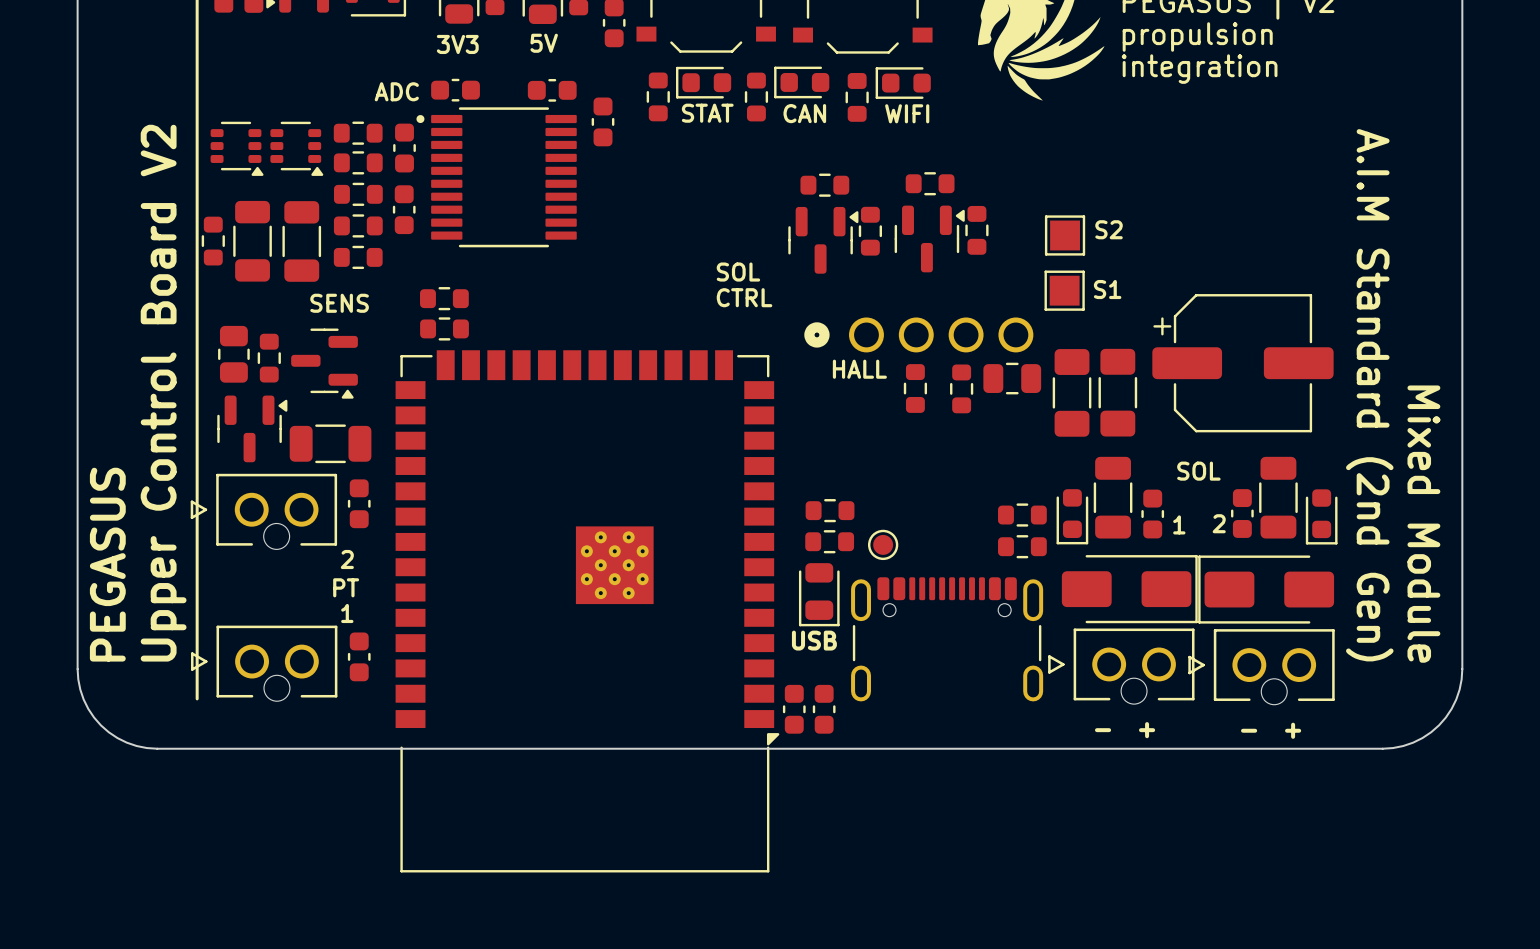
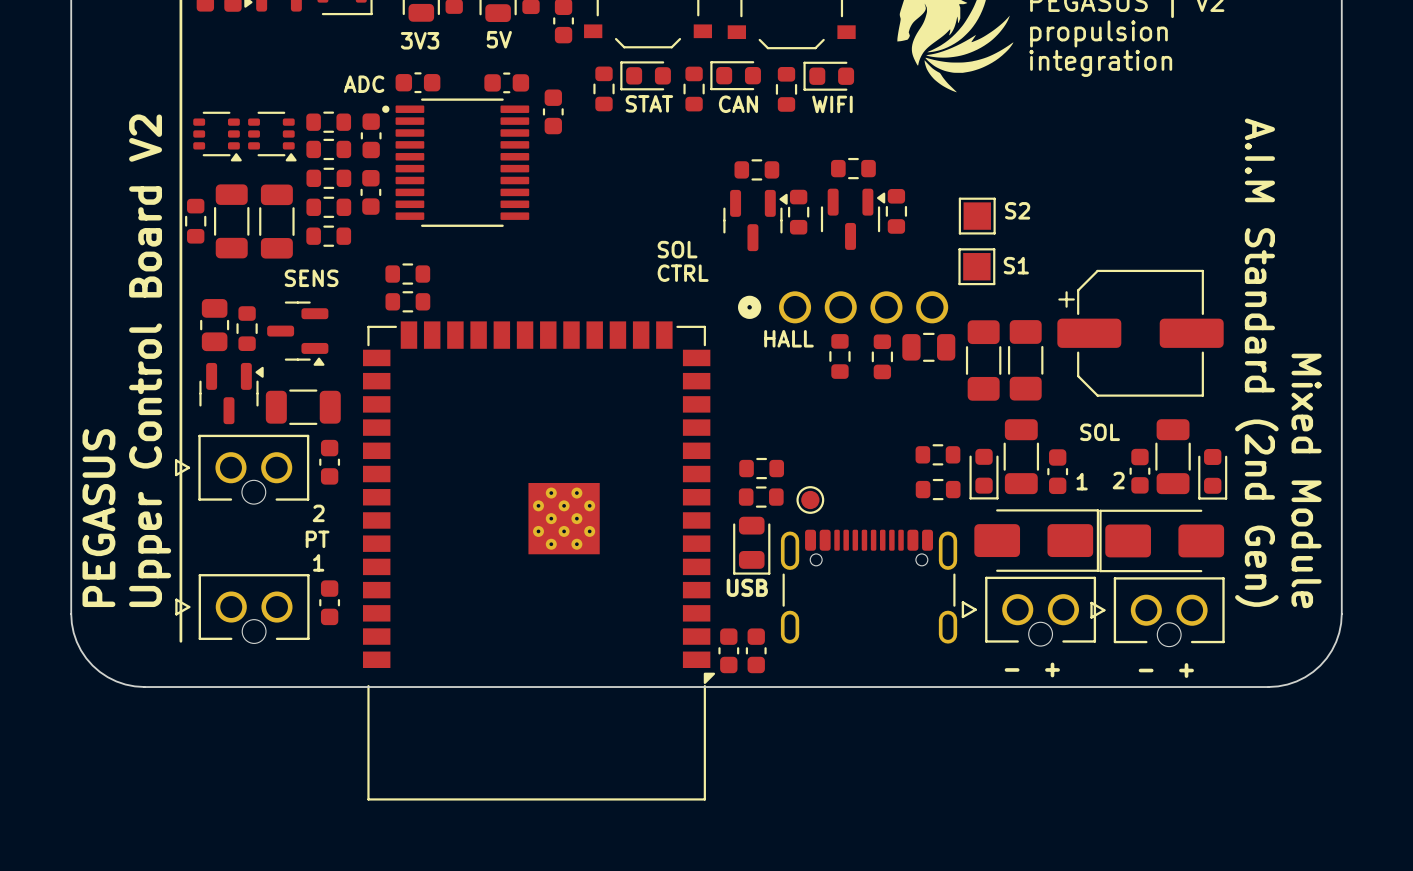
part: none -> (937, 454)
part: (1022, 515) -> none
part: none -> (938, 489)
part: (1022, 546) -> none

